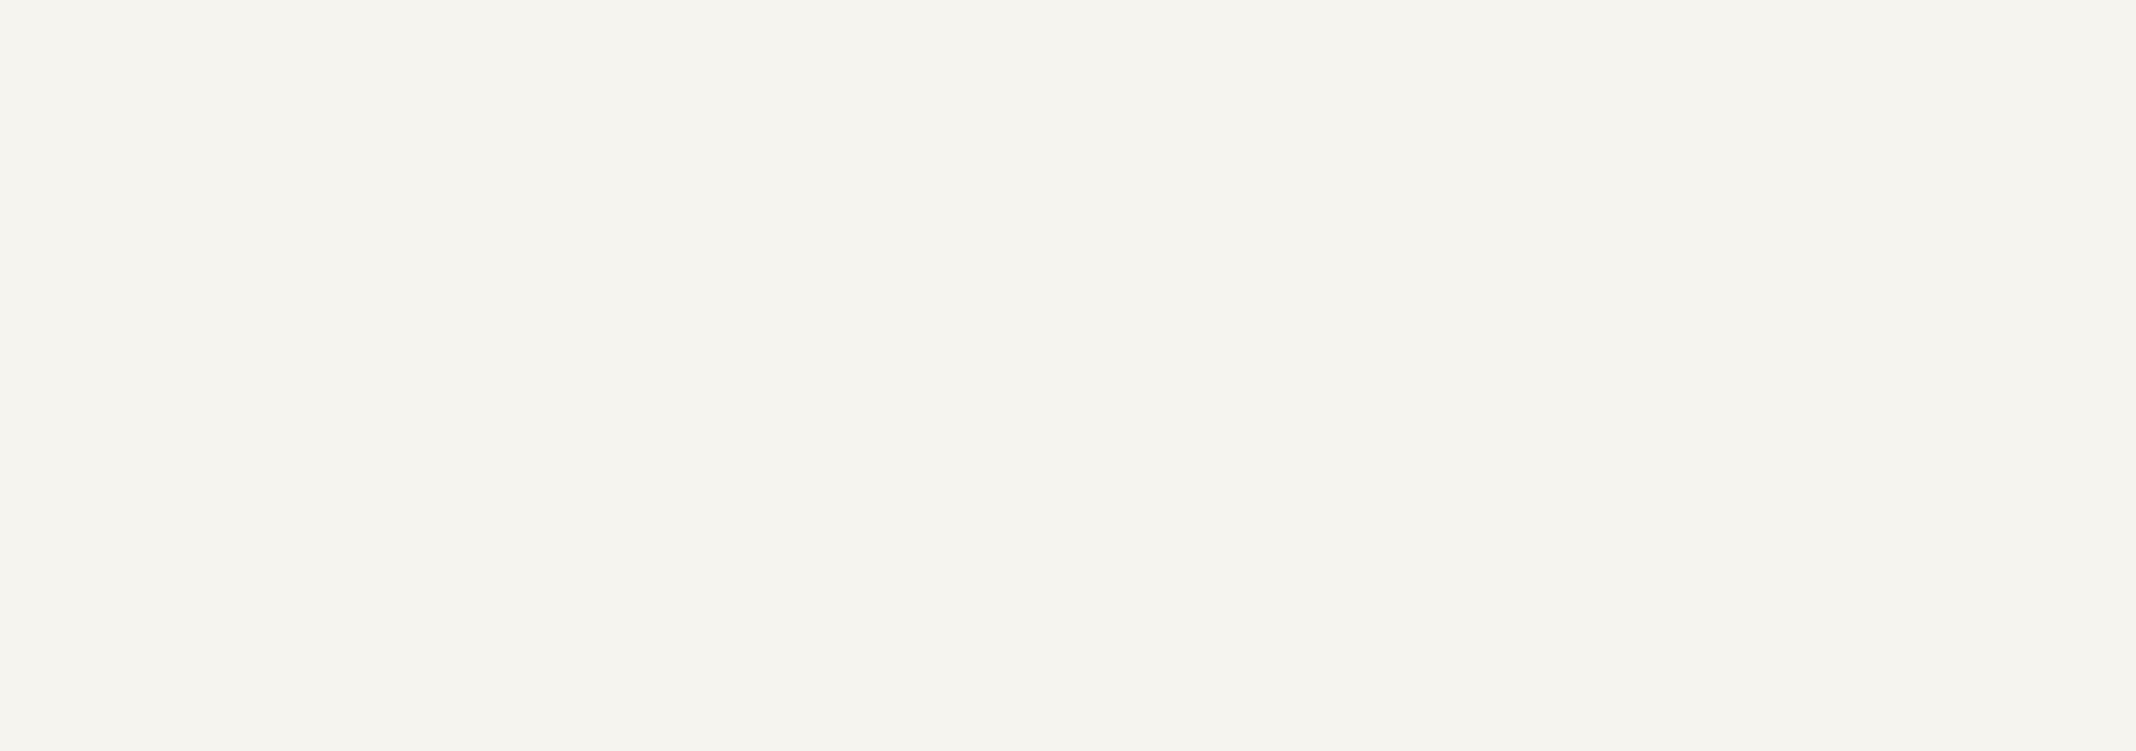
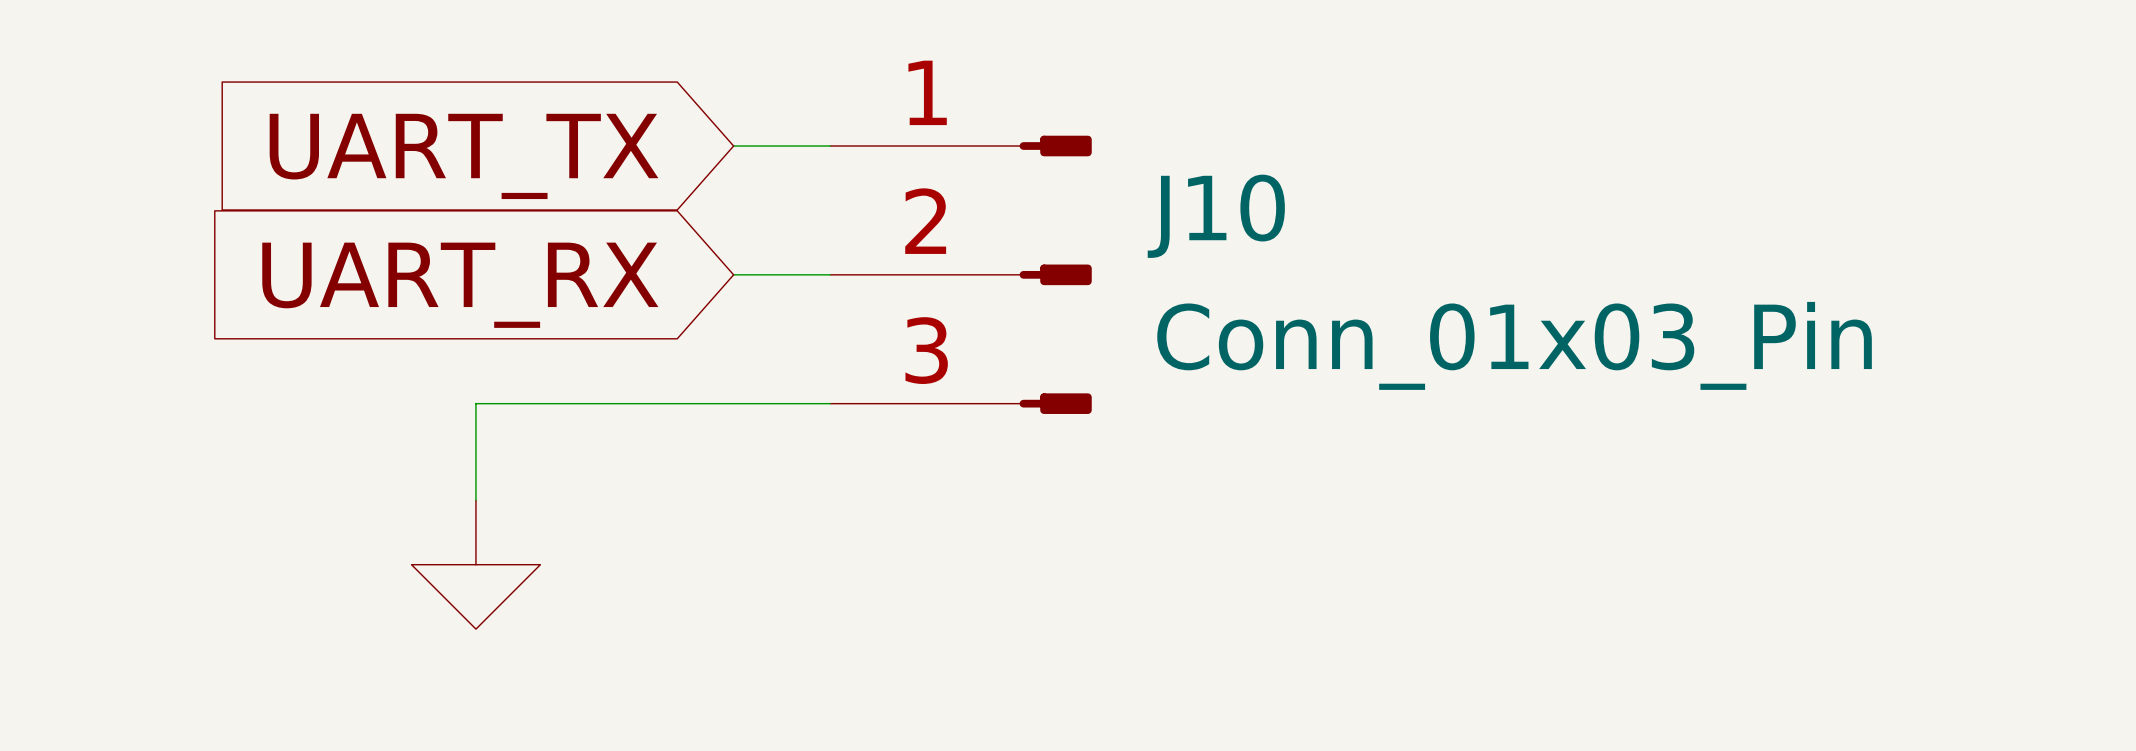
wire: none -> (733, 146) (830, 146)
global label: none -> UART_TX (464, 156)
wire: none -> (733, 274) (830, 274)
J10: none -> Conn_01x03_Pin (960, 274)
global label: none -> UART_RX (460, 285)
wire: none -> (830, 403) (475, 403) (475, 500)
power symbol: none -> (475, 564)

